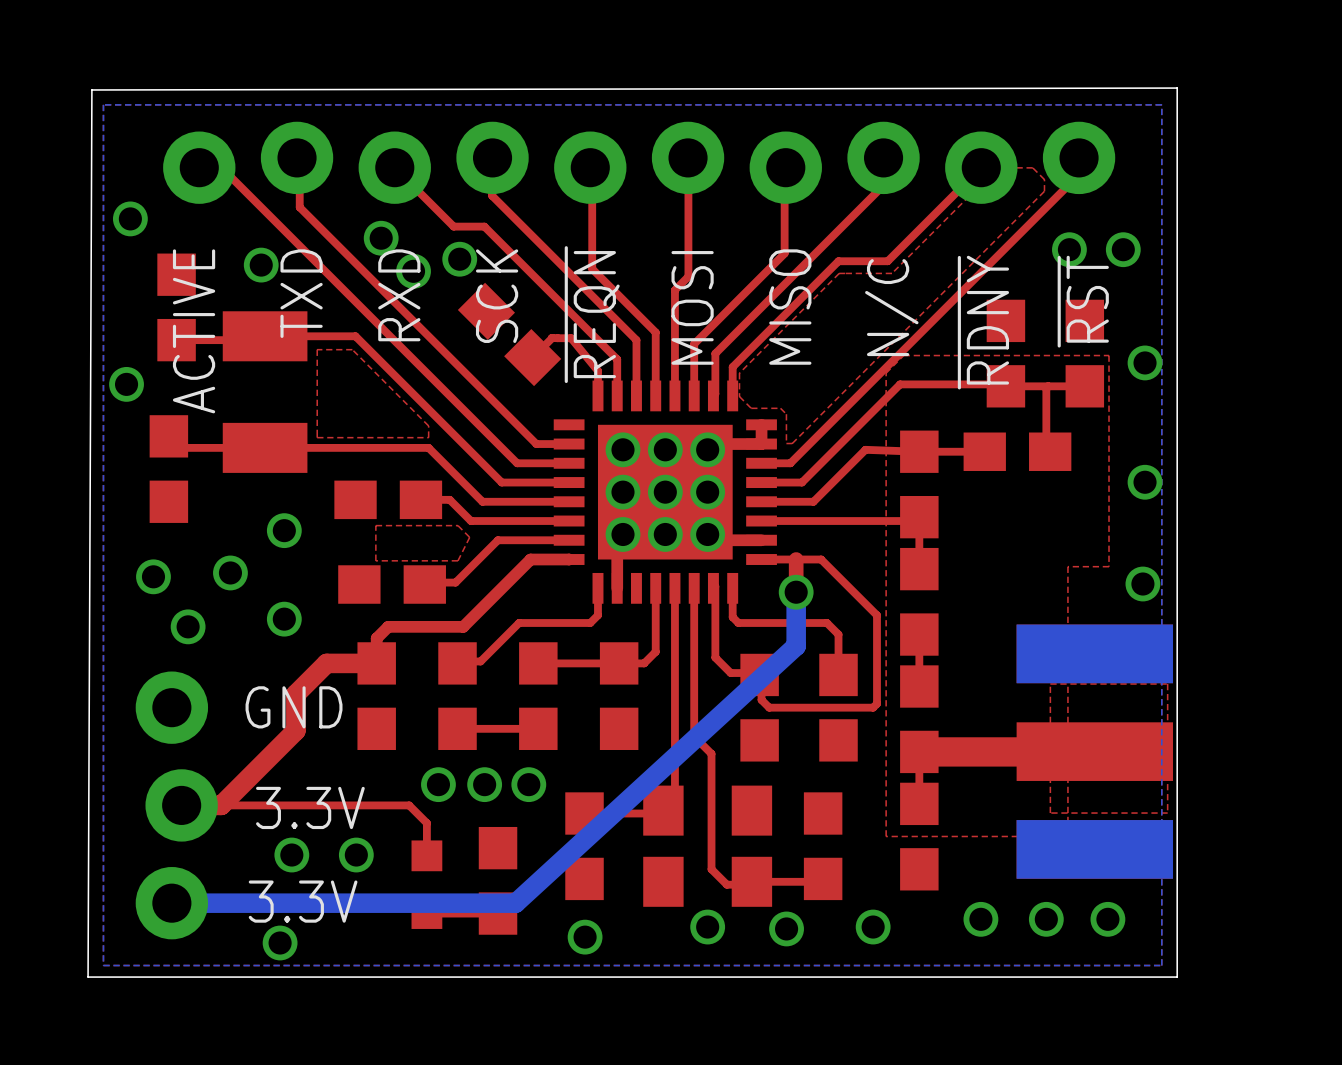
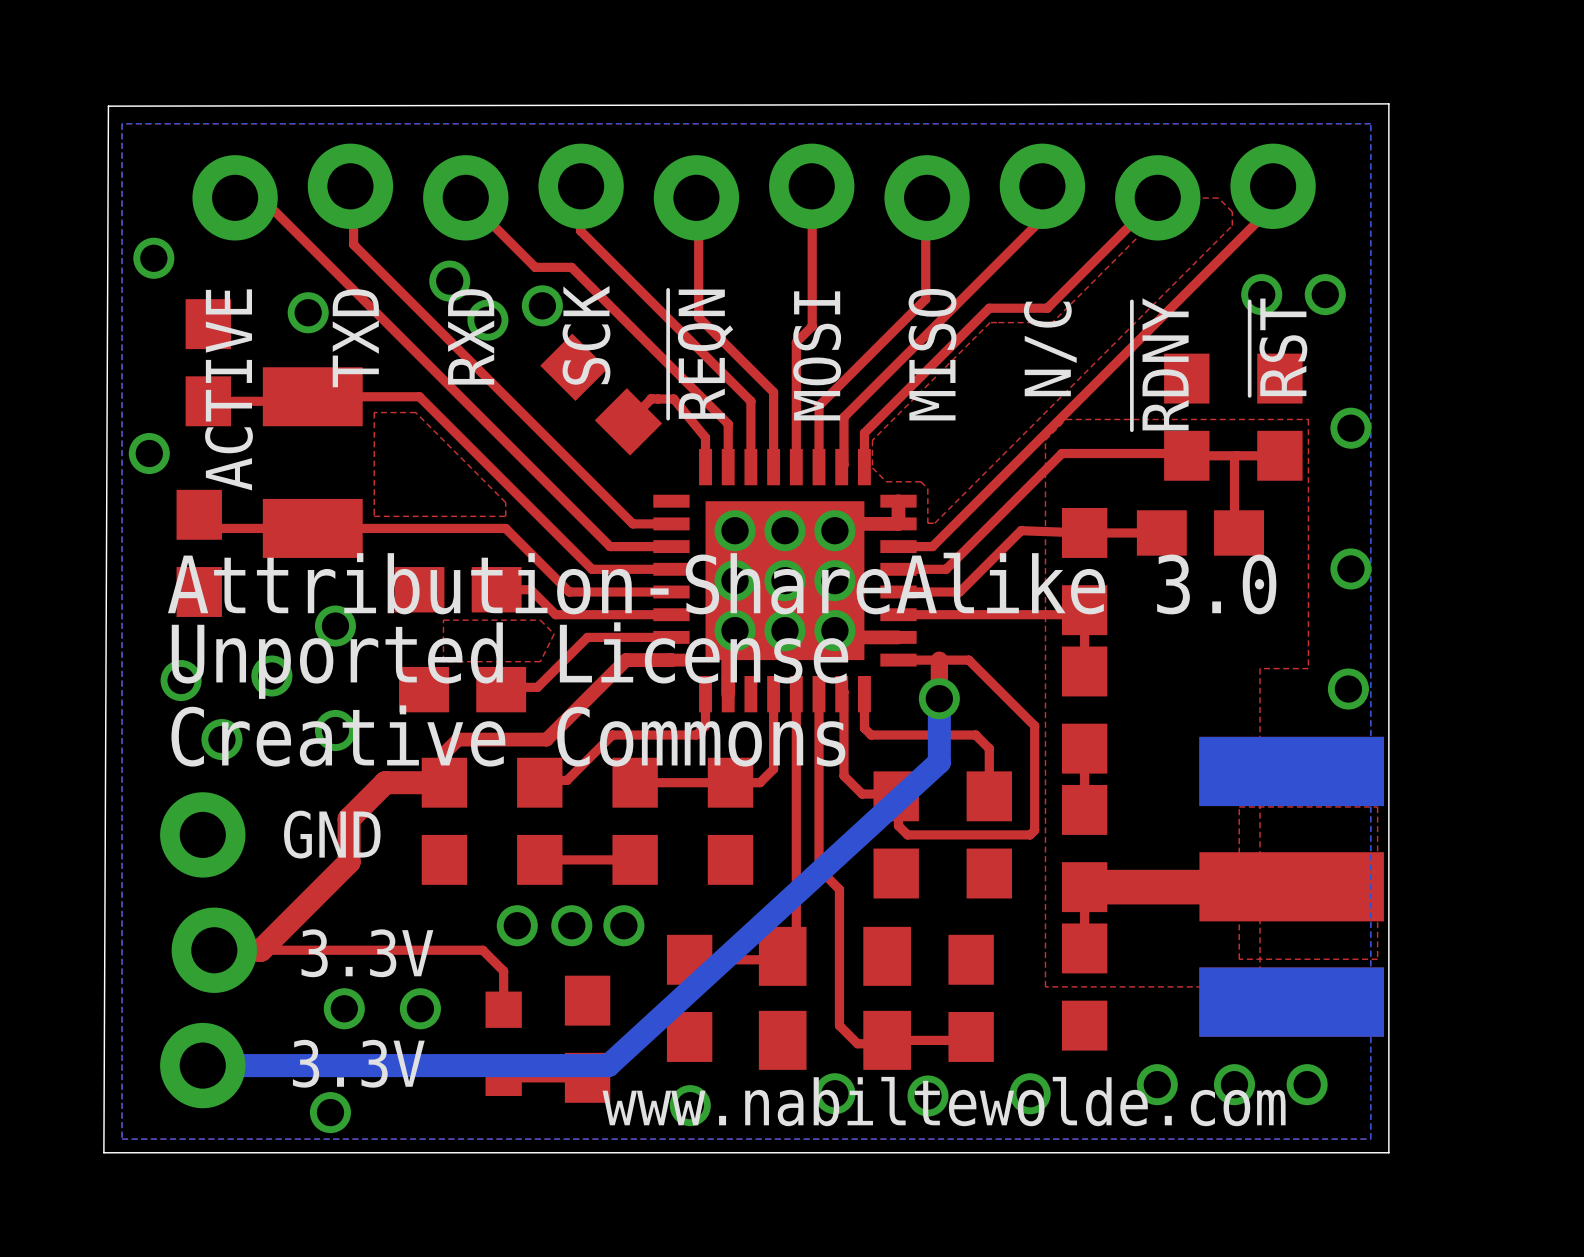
text: none -> Attribution-ShareAlike 3.0 (722, 583)
text: none -> Unported License (509, 660)
text: none -> Creative Commons (508, 735)
text: none -> www.nabiltewolde.com (944, 1101)

